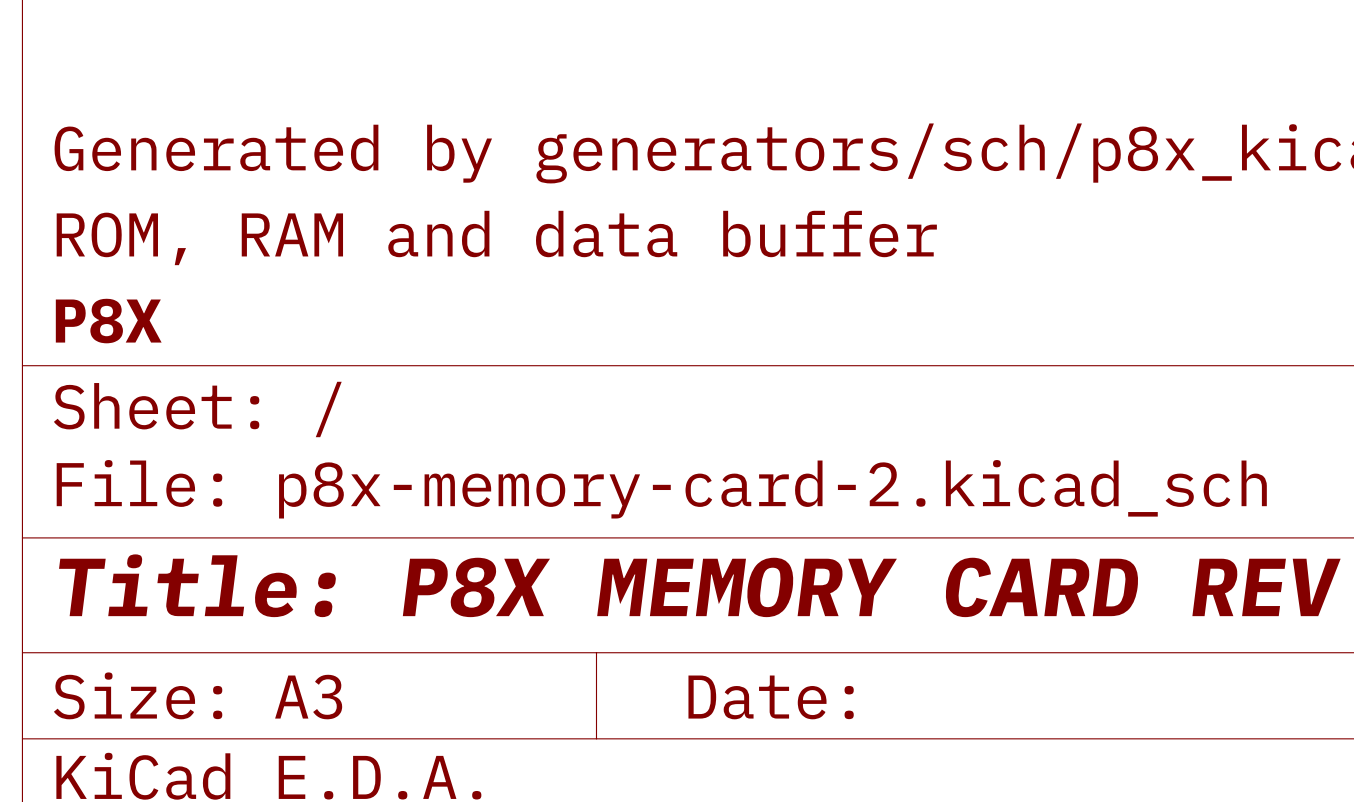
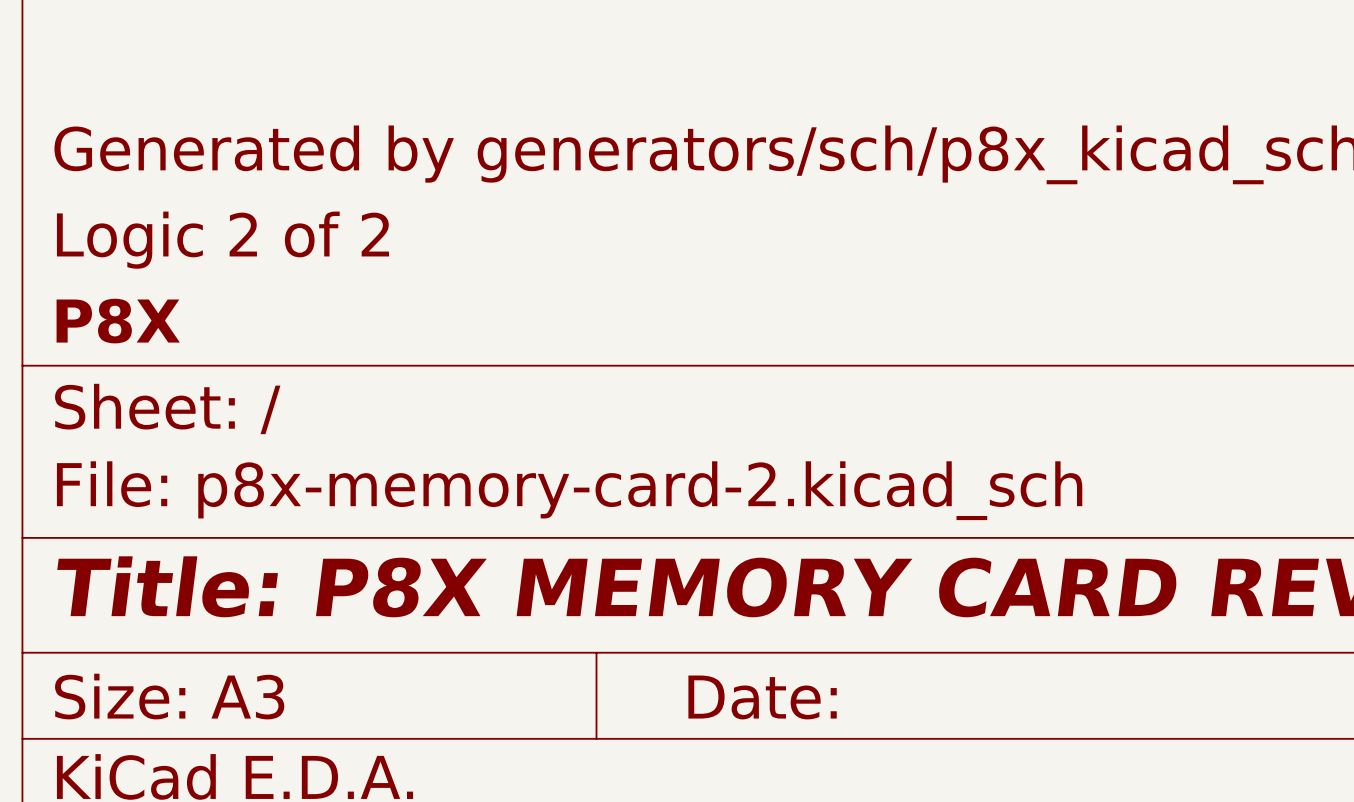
title block: ROM, RAM and data buffer (496, 237) -> Logic 2 of 2 (222, 240)

